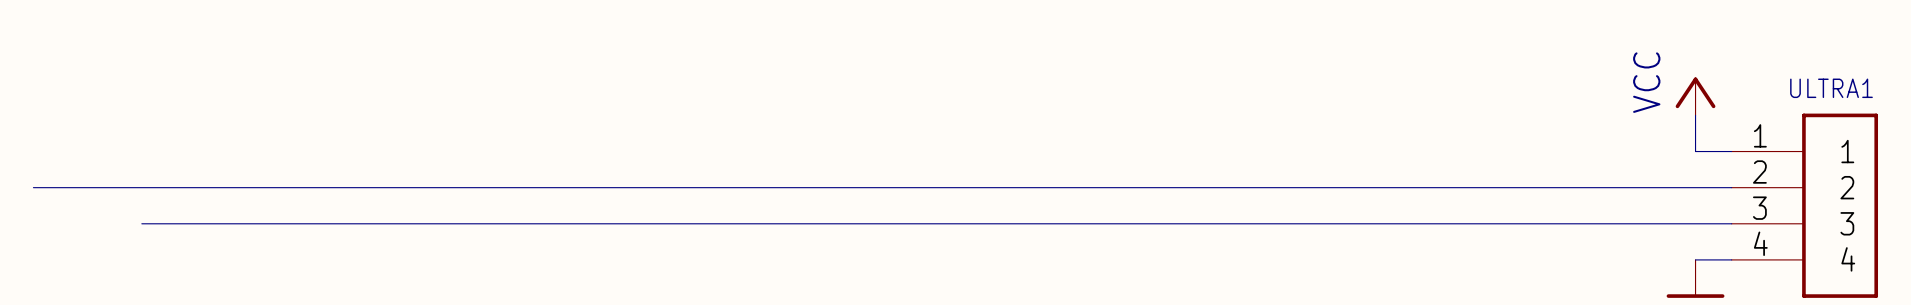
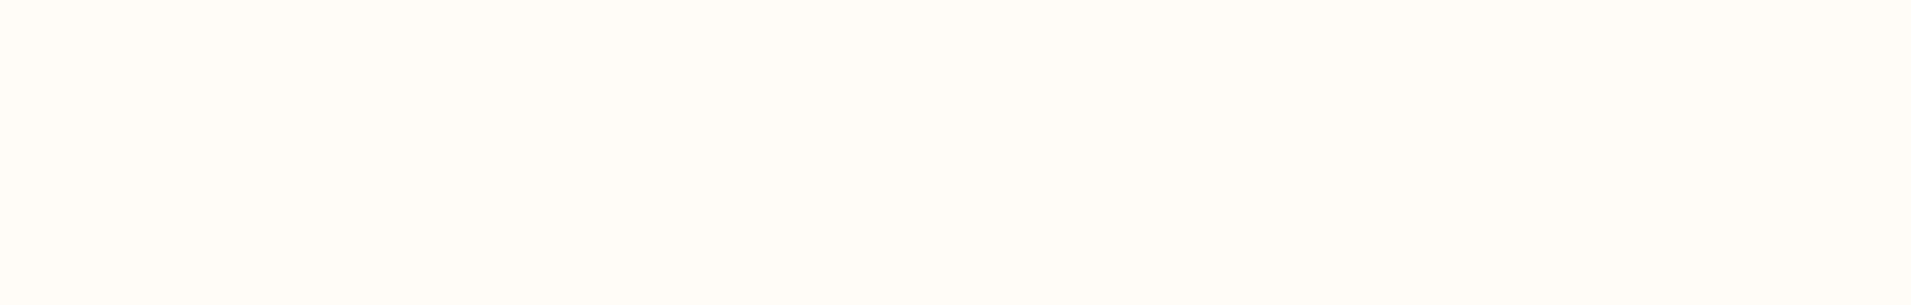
power symbol: VCC (1695, 96) -> none
wire: (1695, 115) (1695, 151) (1731, 151) -> none
wire: (33, 187) (1731, 187) -> none
ULTRA1: (1804, 205) -> none
wire: (141, 223) (1731, 223) -> none
wire: (1695, 259) (1731, 259) -> none
power symbol: (1695, 278) -> none

